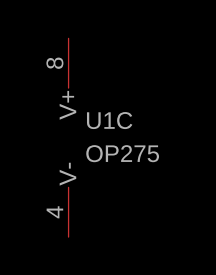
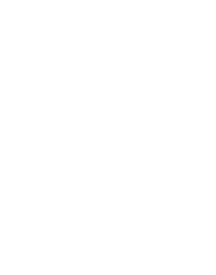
U1C: OP275 (68, 137) -> none

